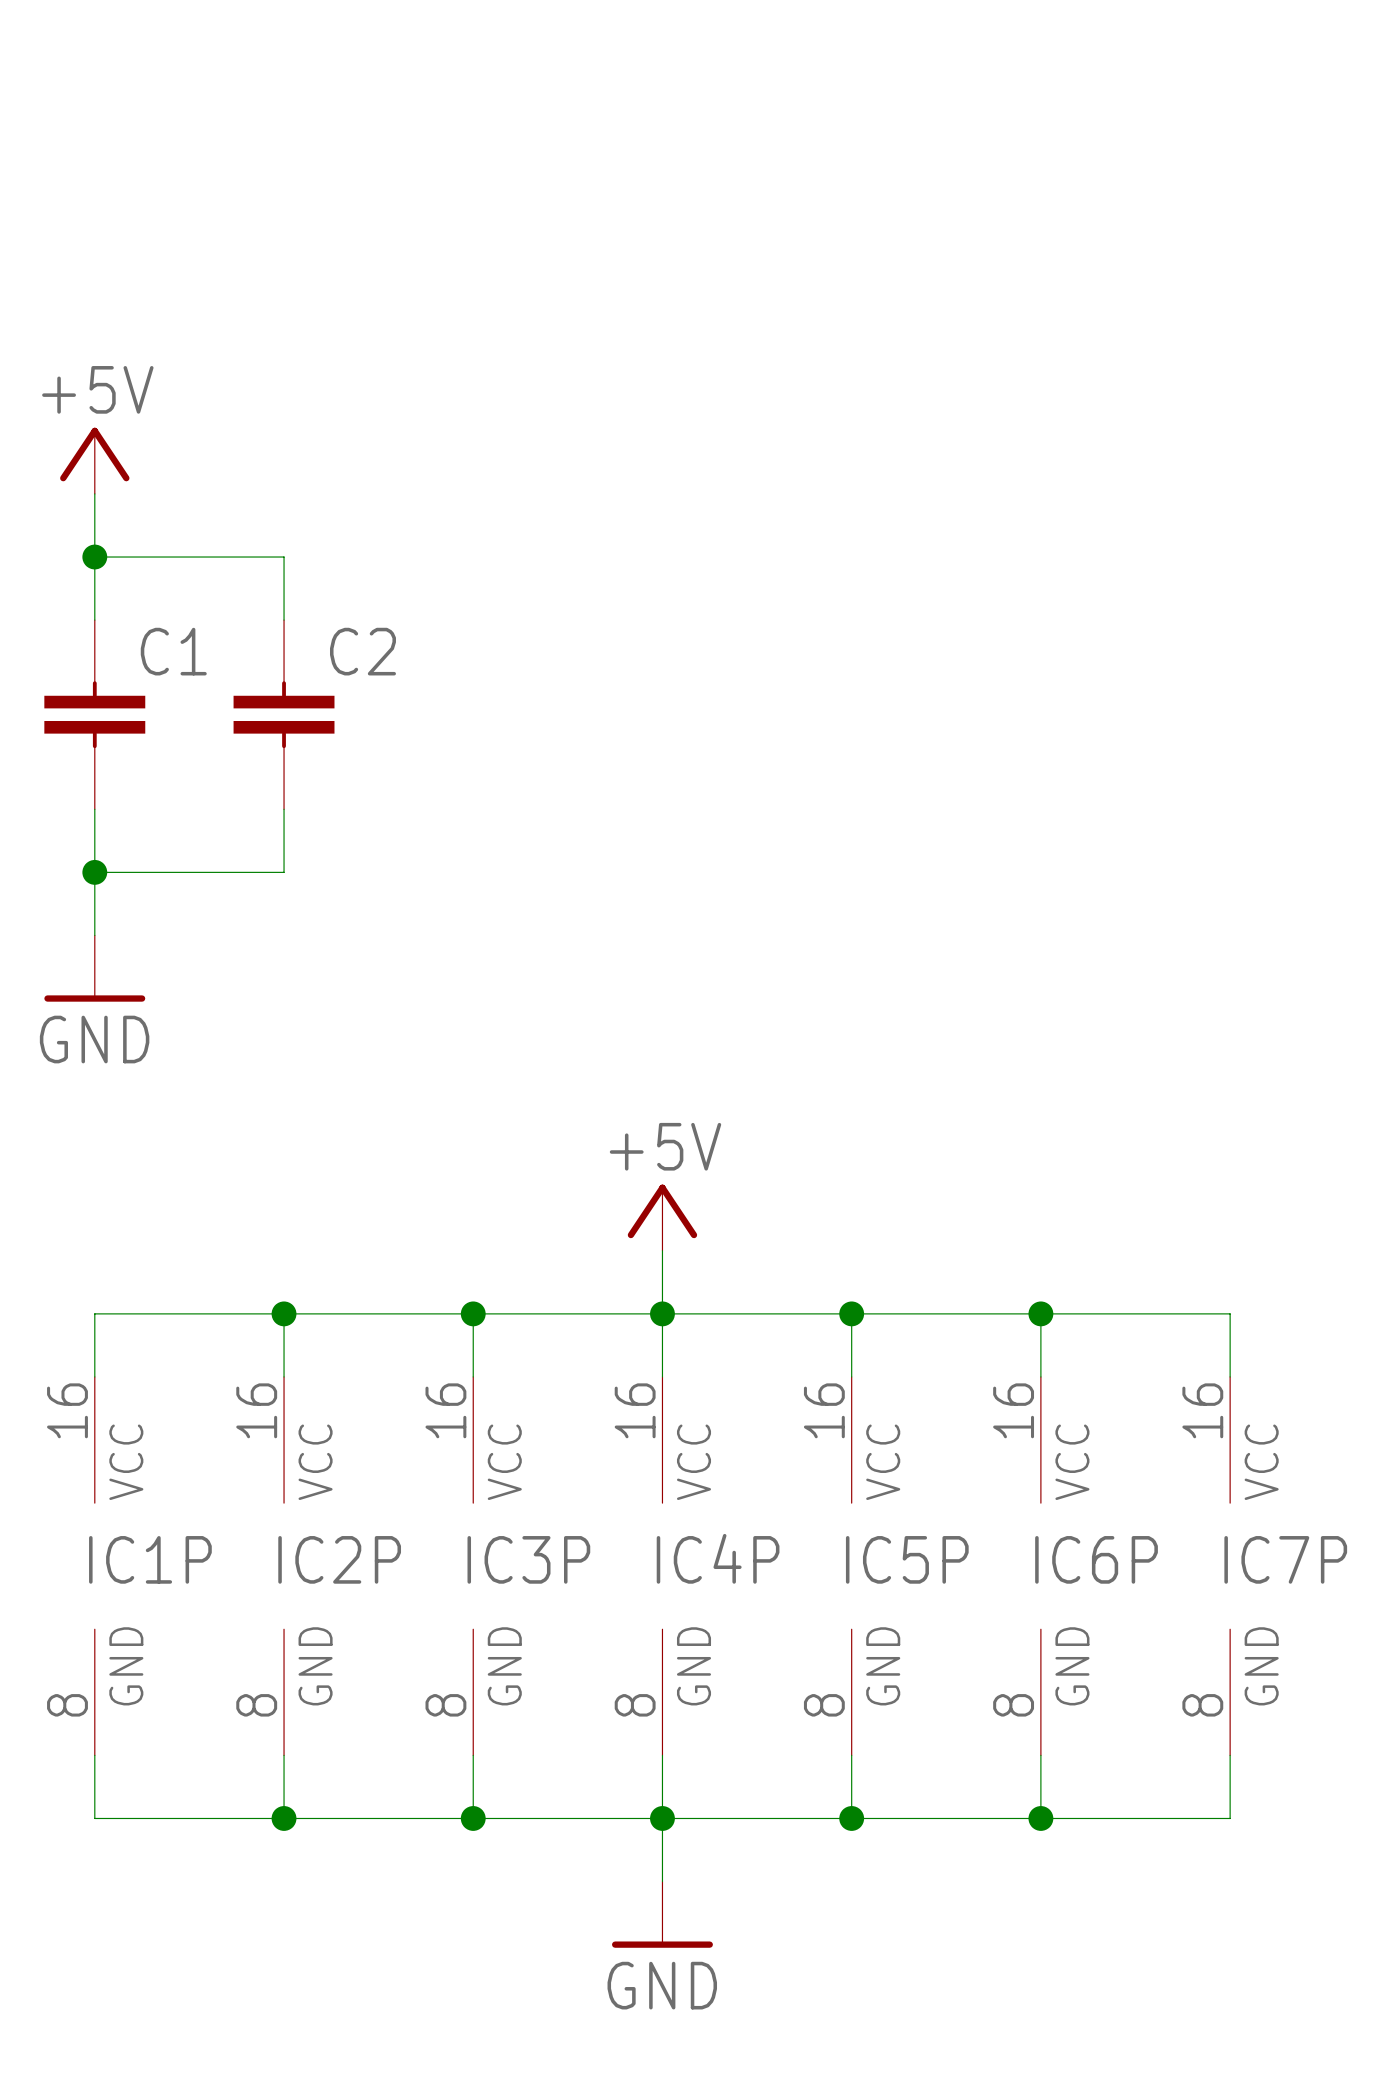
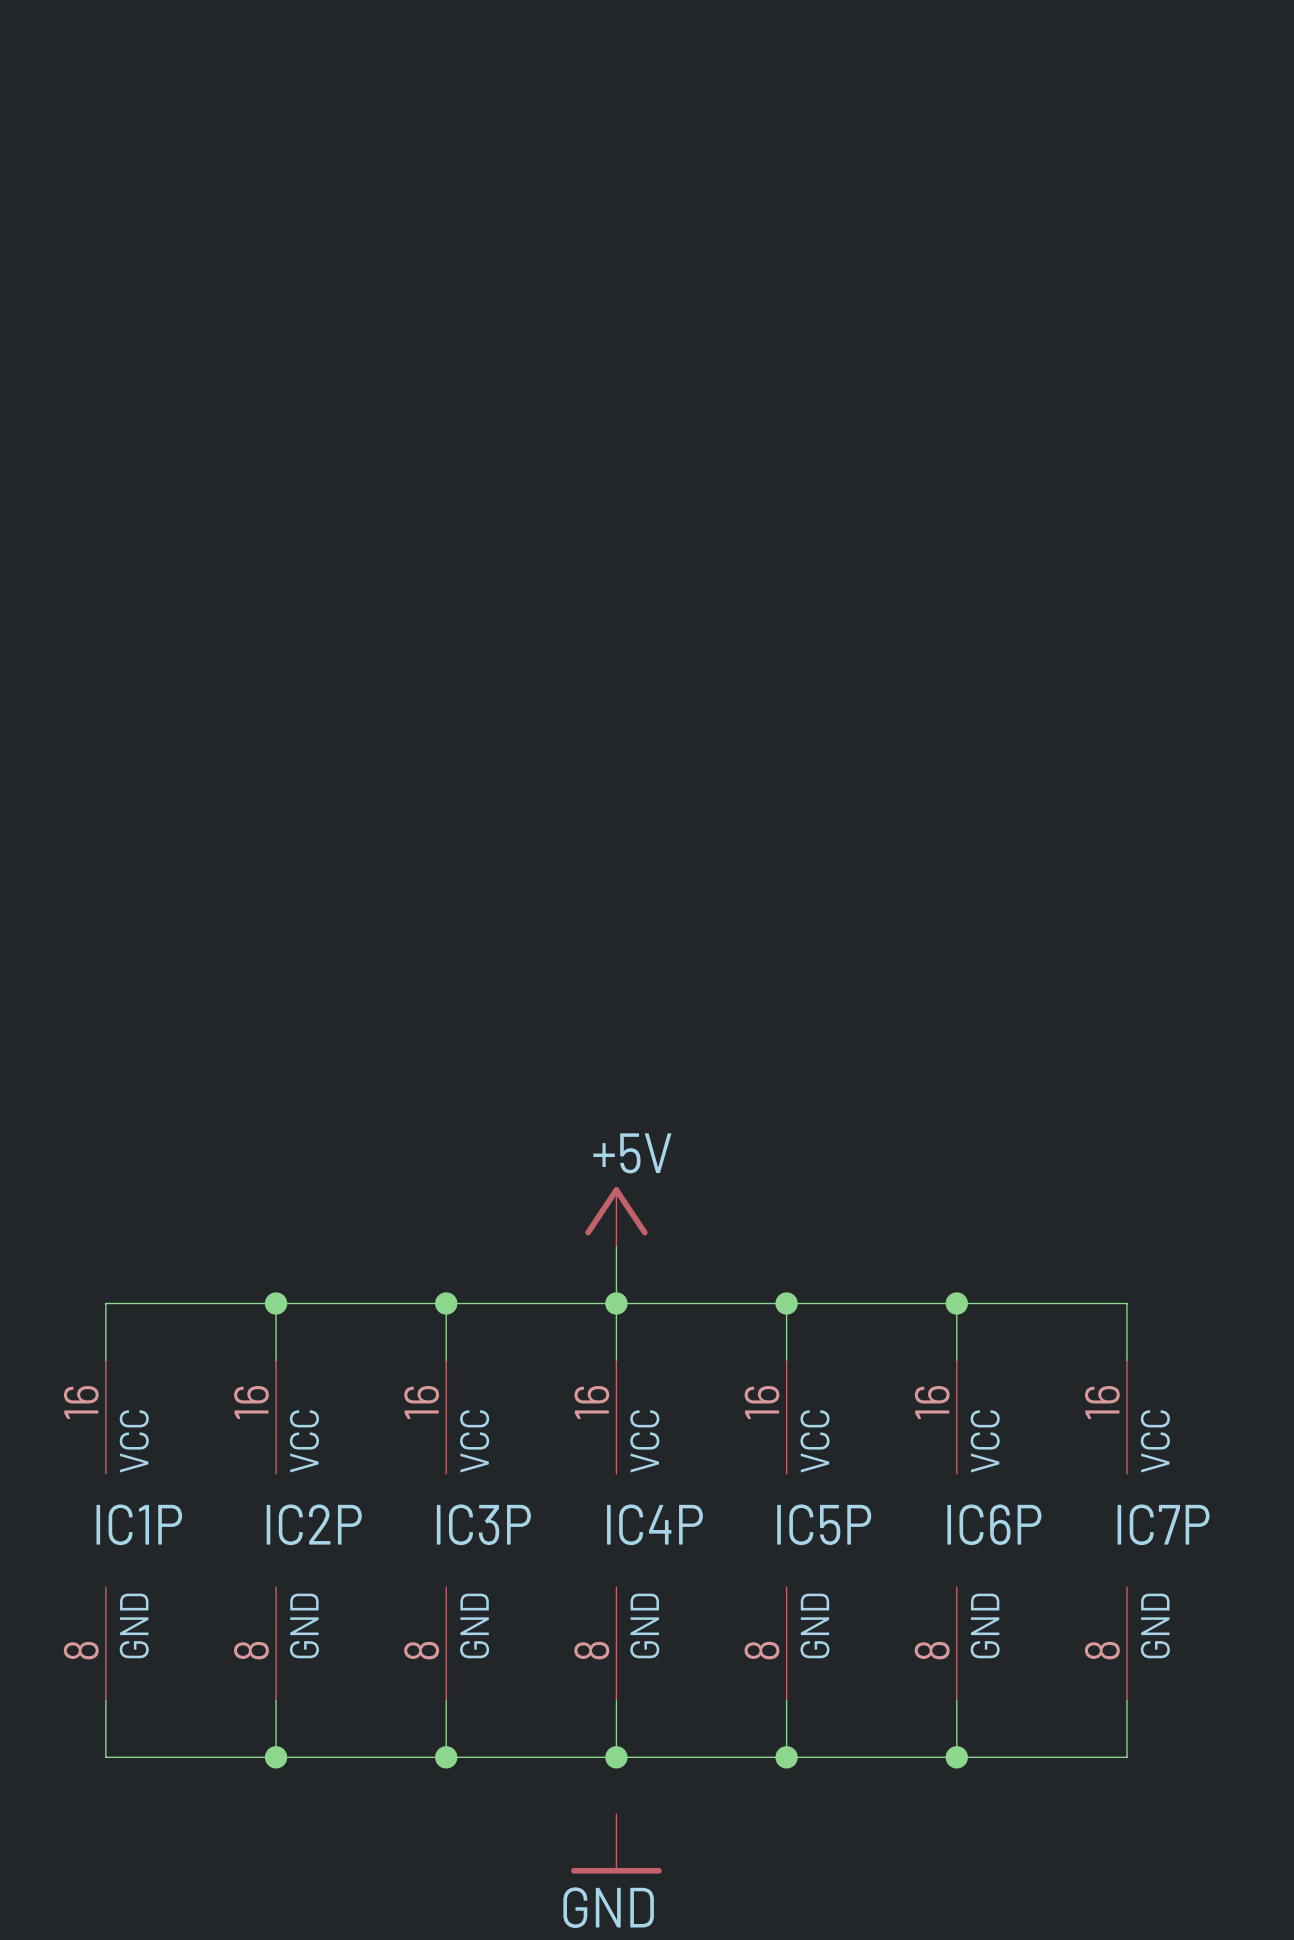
power symbol: +5V (94, 460) -> none
wire: (94, 493) (94, 620) -> none
wire: (94, 557) (284, 557) (284, 620) -> none
junction: (94, 557) -> none
C1: (94, 714) -> none
C2: (284, 714) -> none
wire: (94, 809) (94, 935) -> none
wire: (284, 809) (284, 872) (94, 872) -> none
junction: (94, 872) -> none
power symbol: GND (94, 968) -> none
wire: (662, 1818) (662, 1881) -> none

